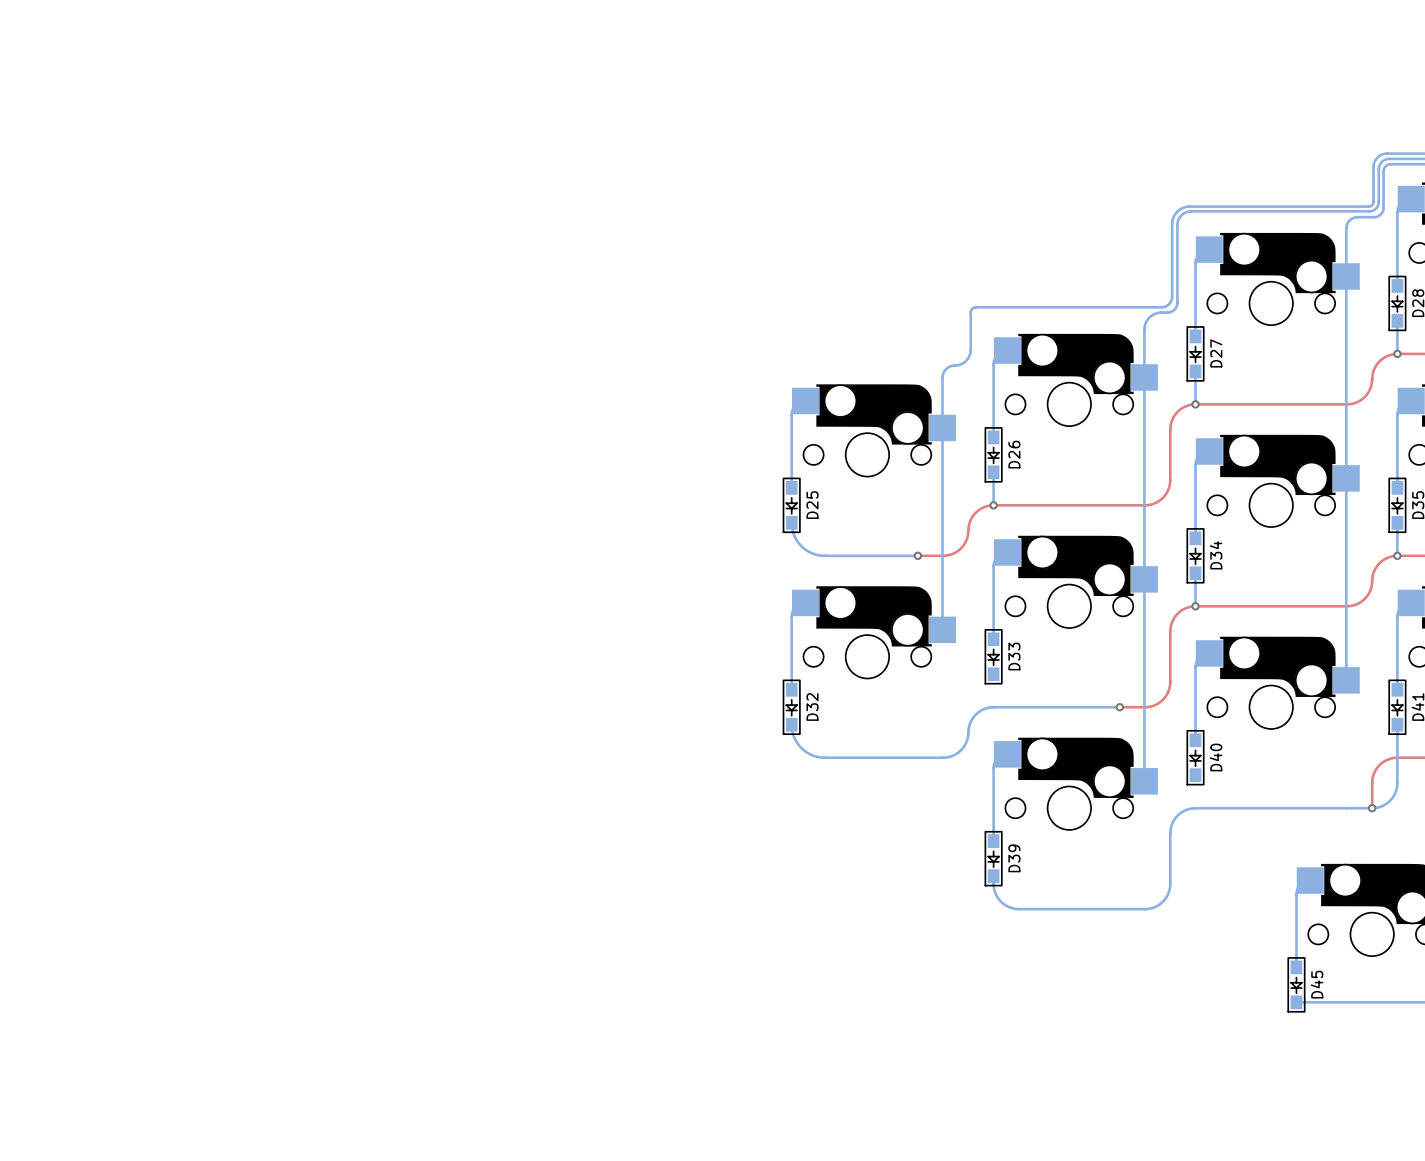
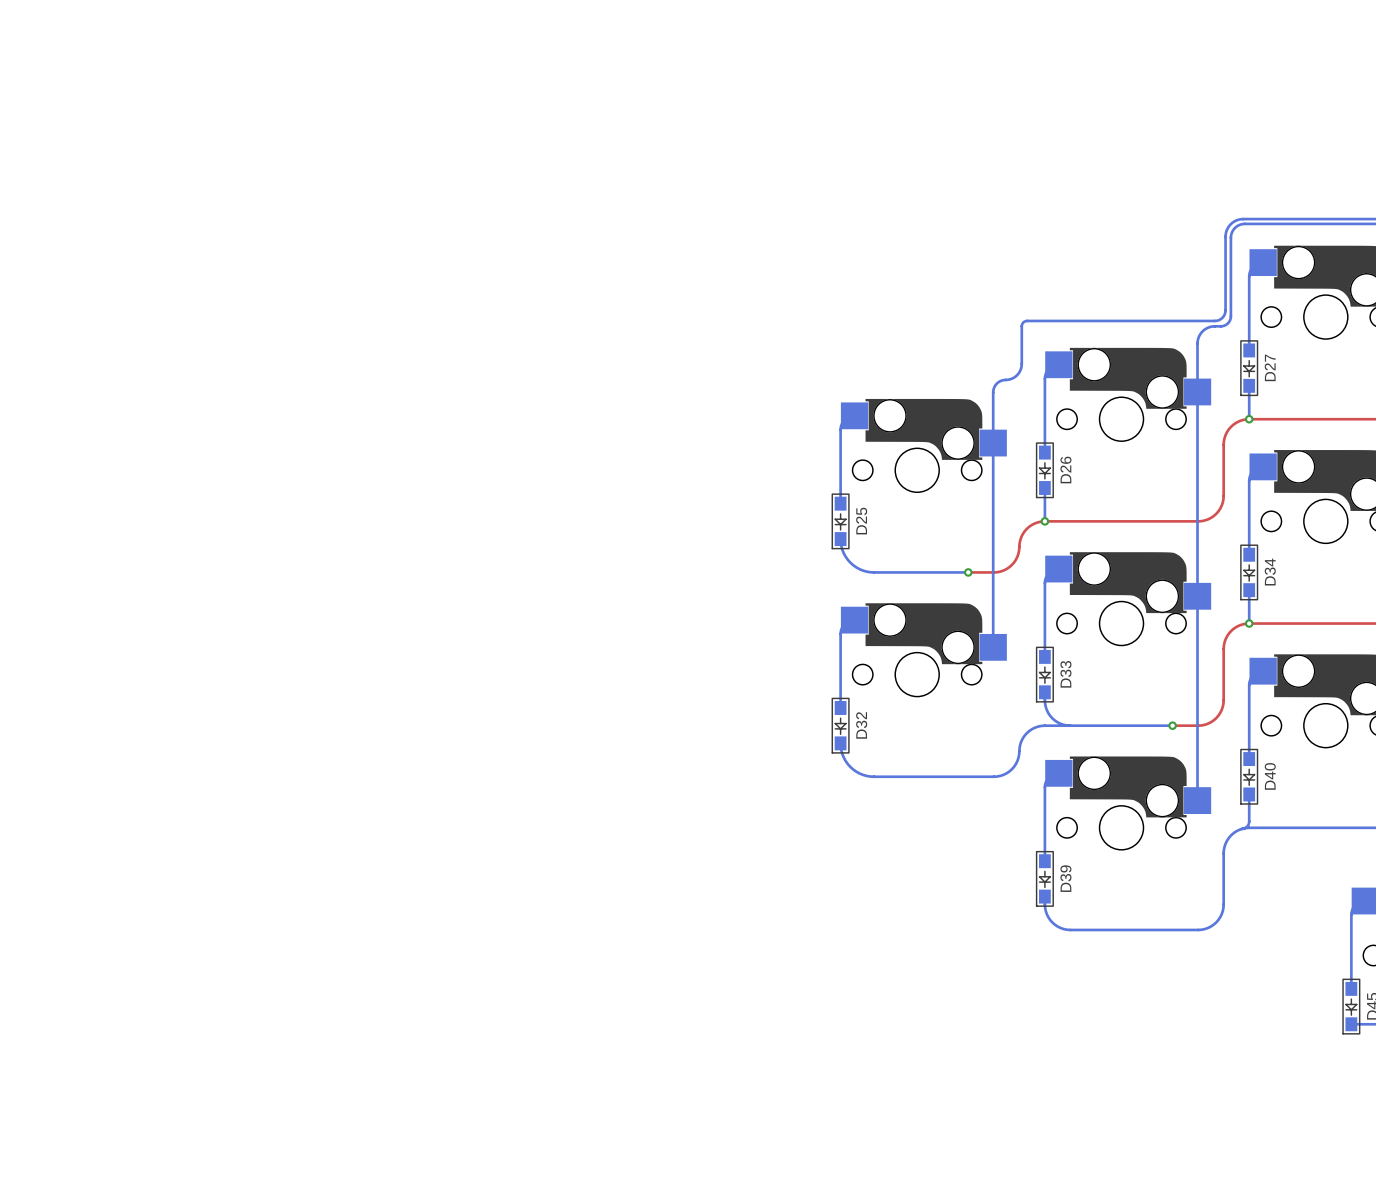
bottom track: none -> (1044, 692) (1045, 706) (1050, 715) (1060, 723) (1070, 725)
bottom track: none -> (1249, 794) (1248, 823) (1246, 827) (1241, 828)

